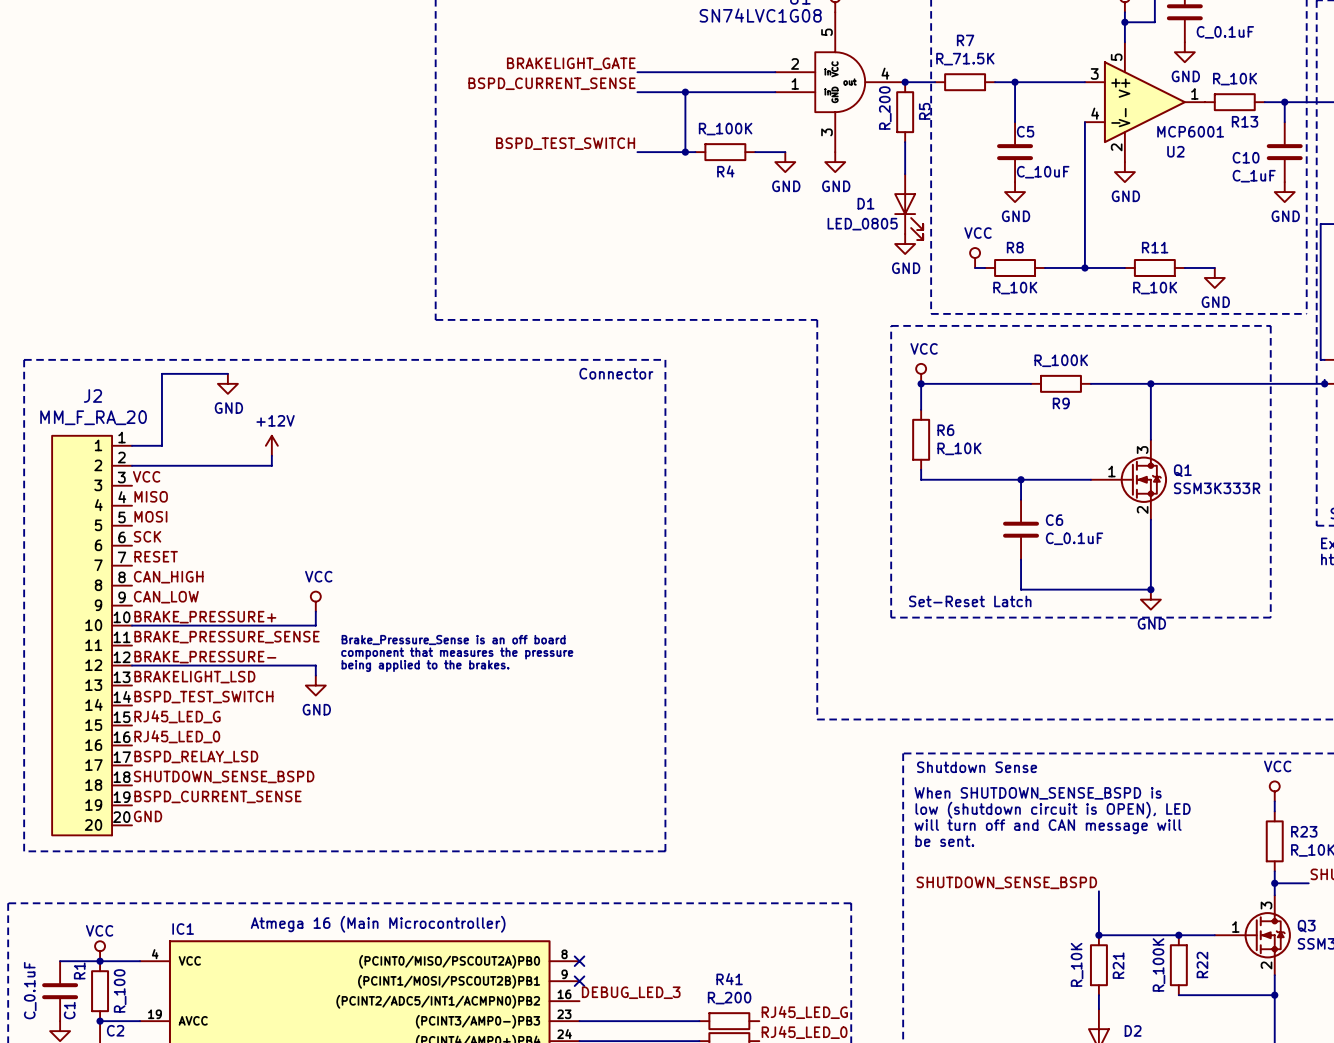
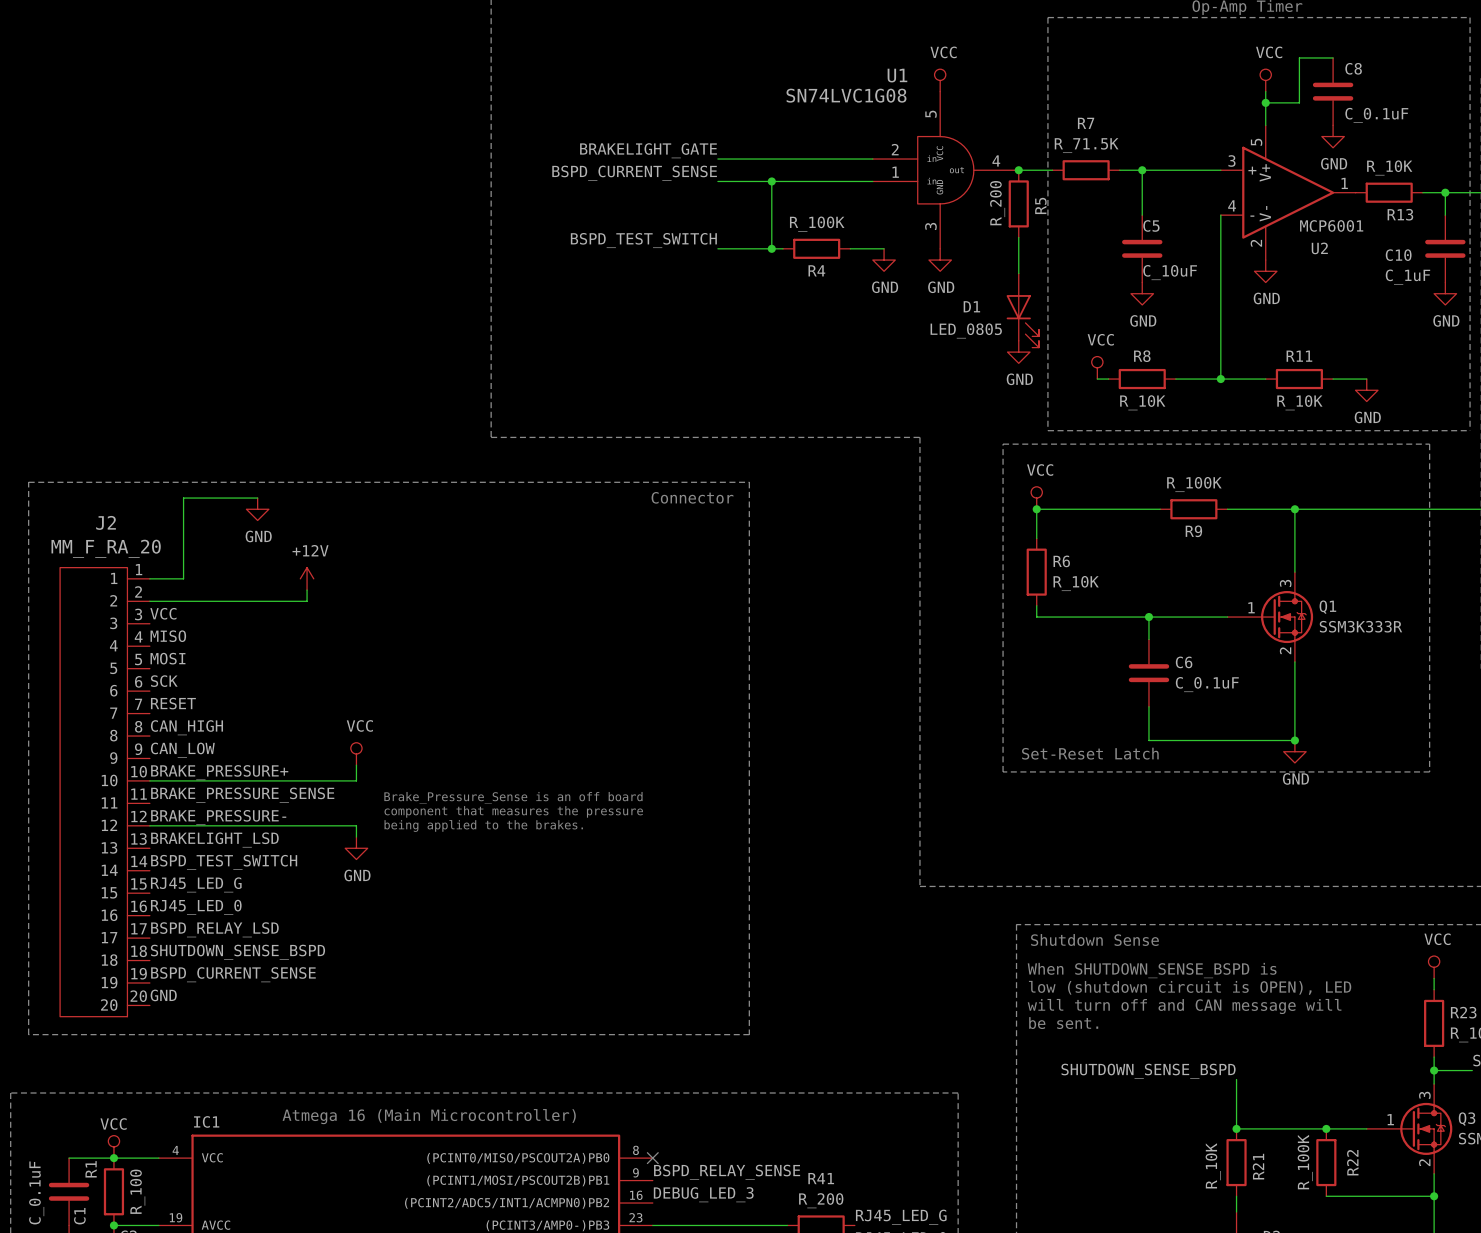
label: none -> BSPD_RELAY_SENSE (727, 1172)
no-connect mark: (579, 981) -> none

